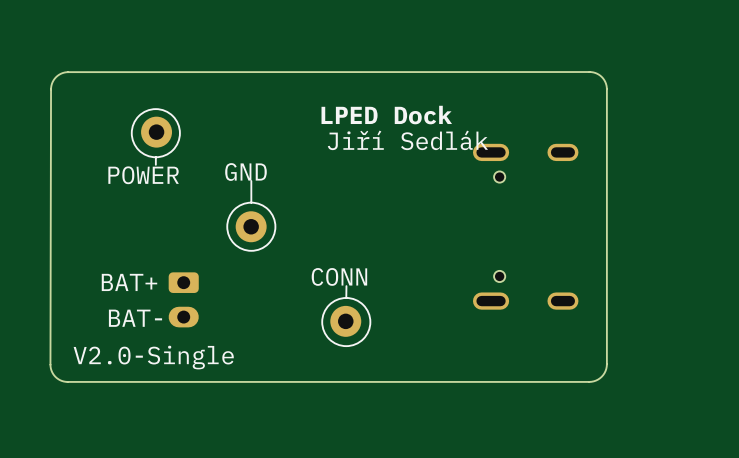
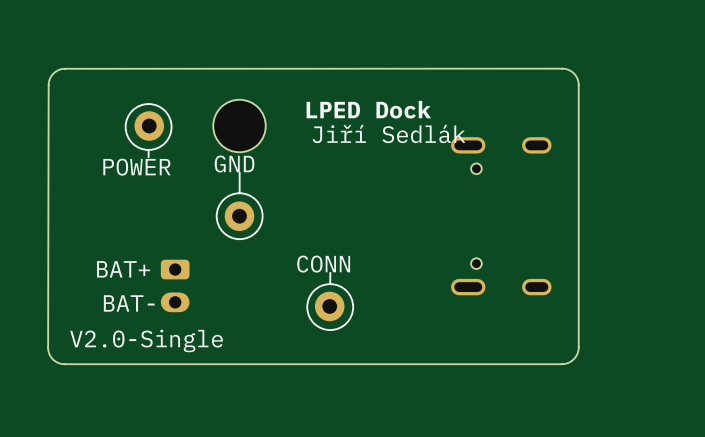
part: none -> (239, 126)

